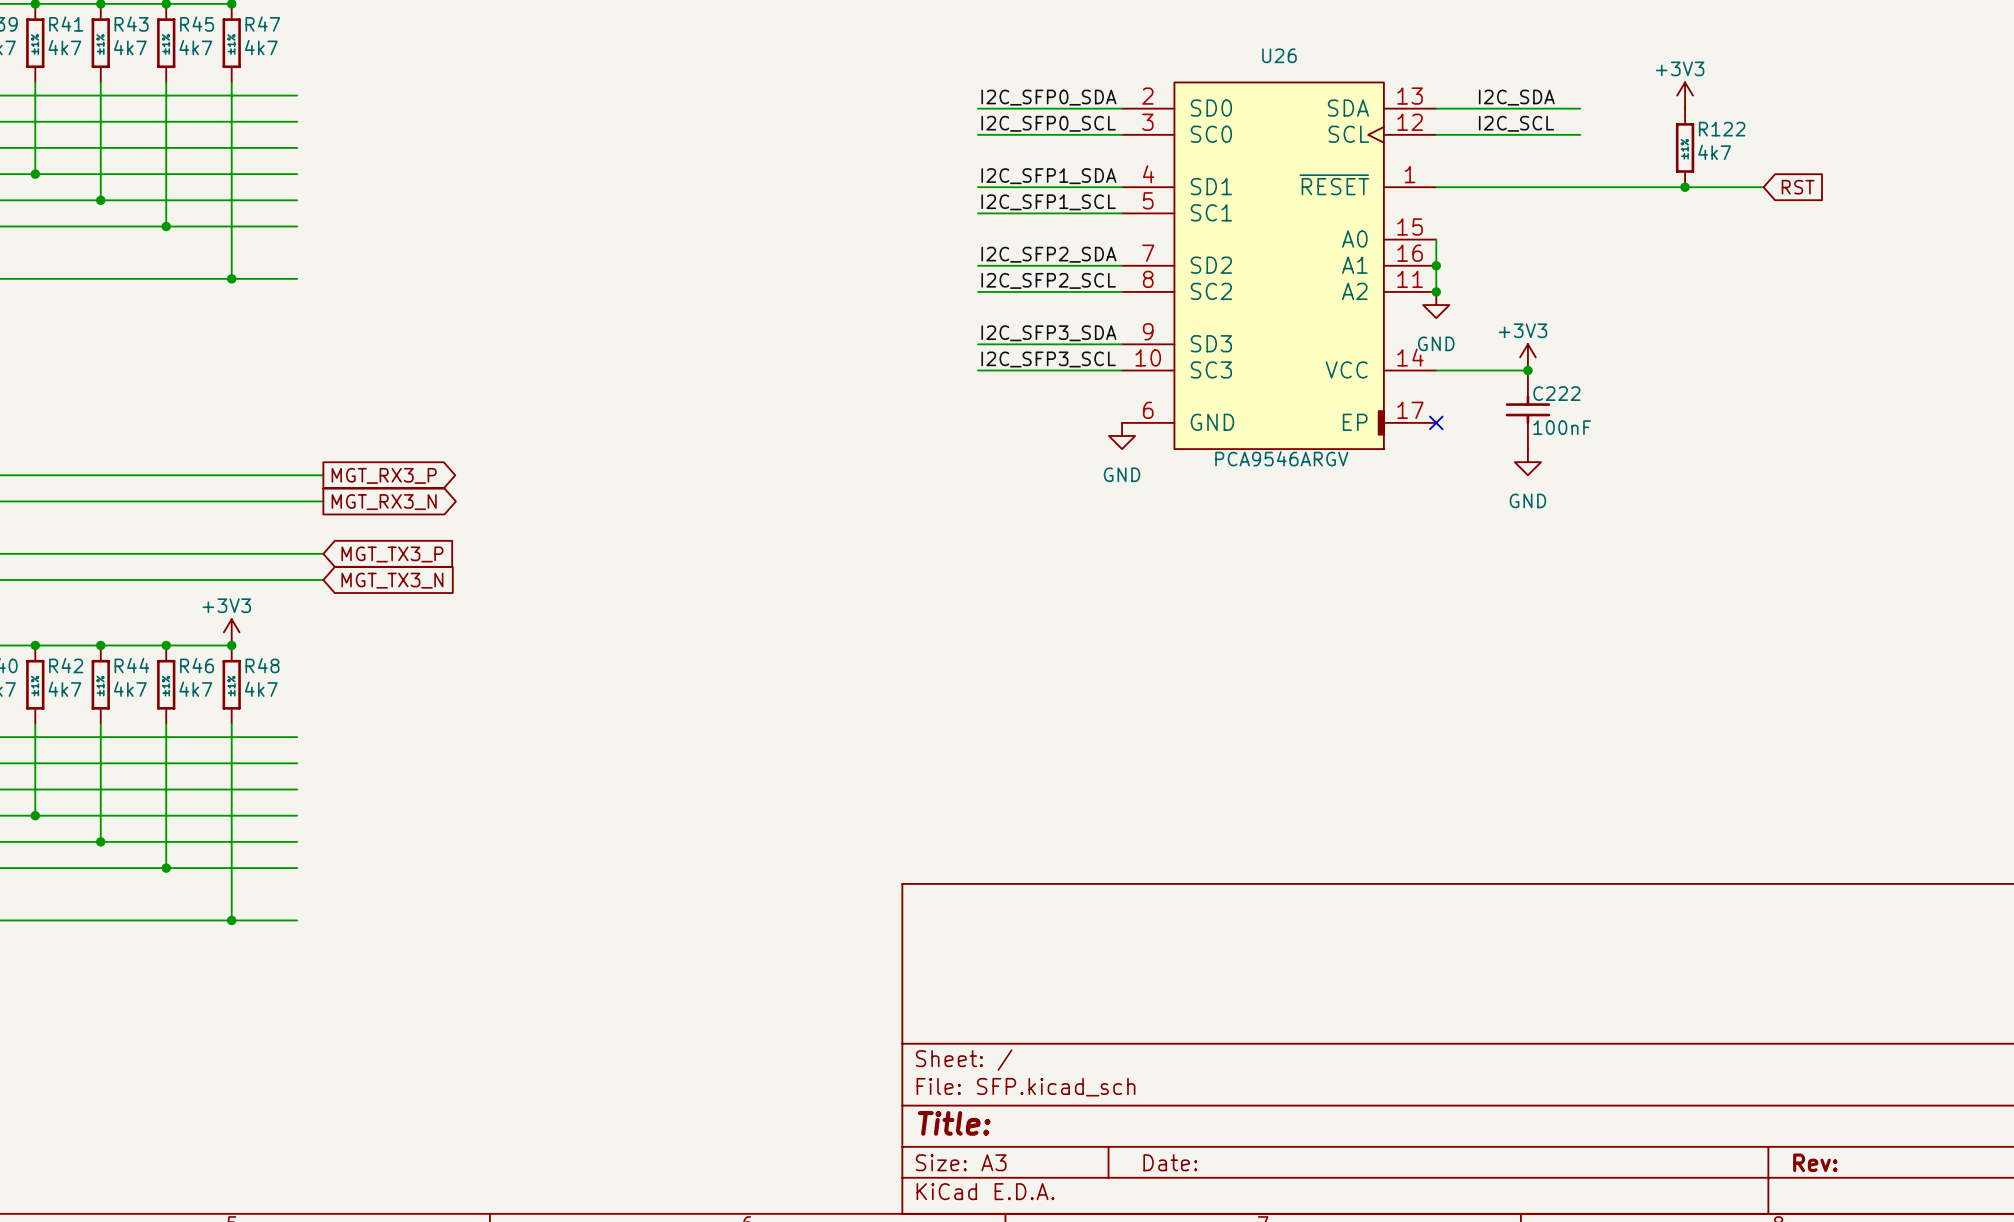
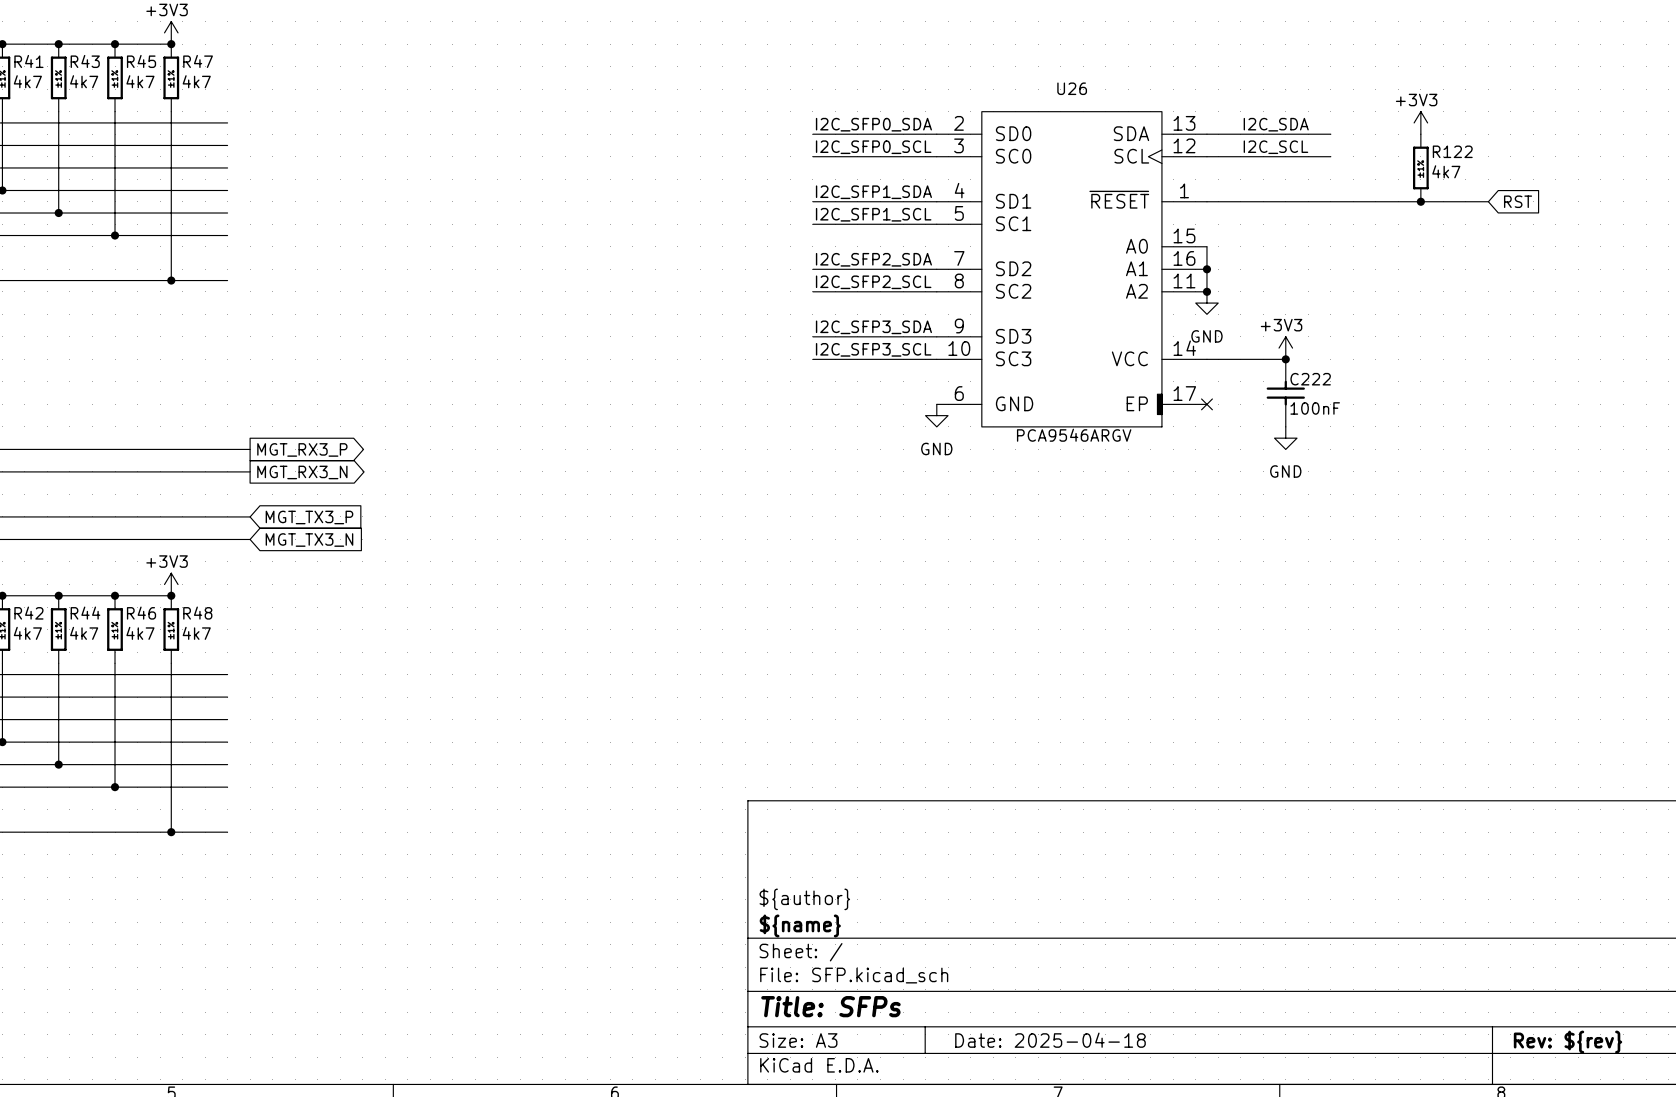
title block: none -> ${author} (804, 899)
title block: none -> ${name} (800, 925)
title block: Title: (954, 1123) -> Title: SFPs (830, 1006)
title block: Date: (1170, 1162) -> Date: 2025-04-18 (1050, 1040)
title block: Rev: (1815, 1162) -> Rev: ${rev} (1568, 1042)

